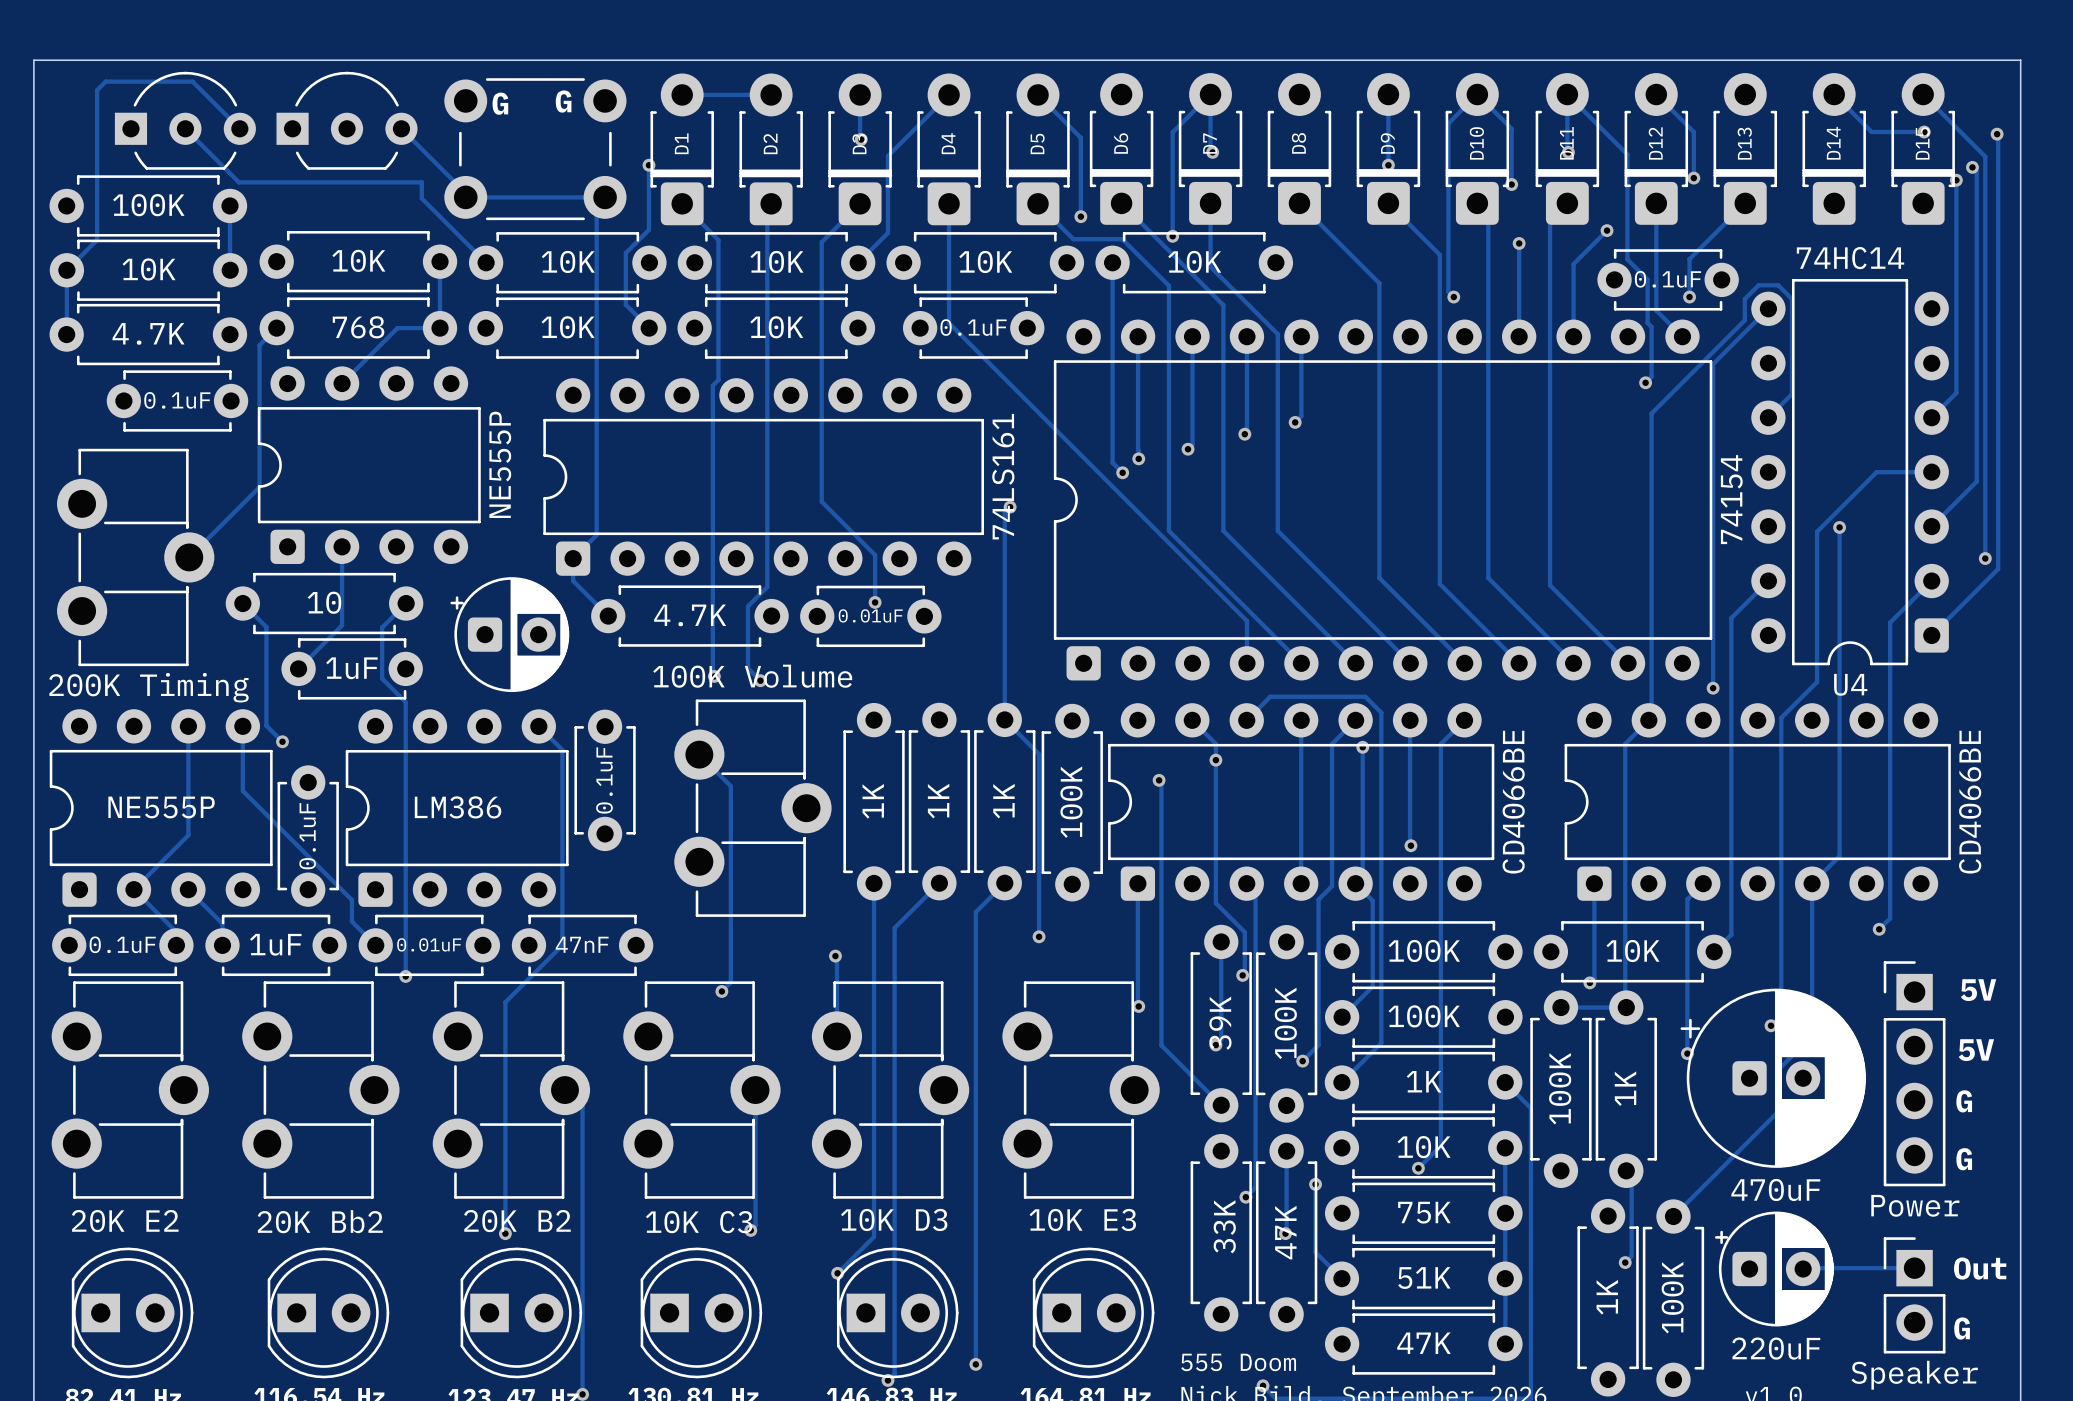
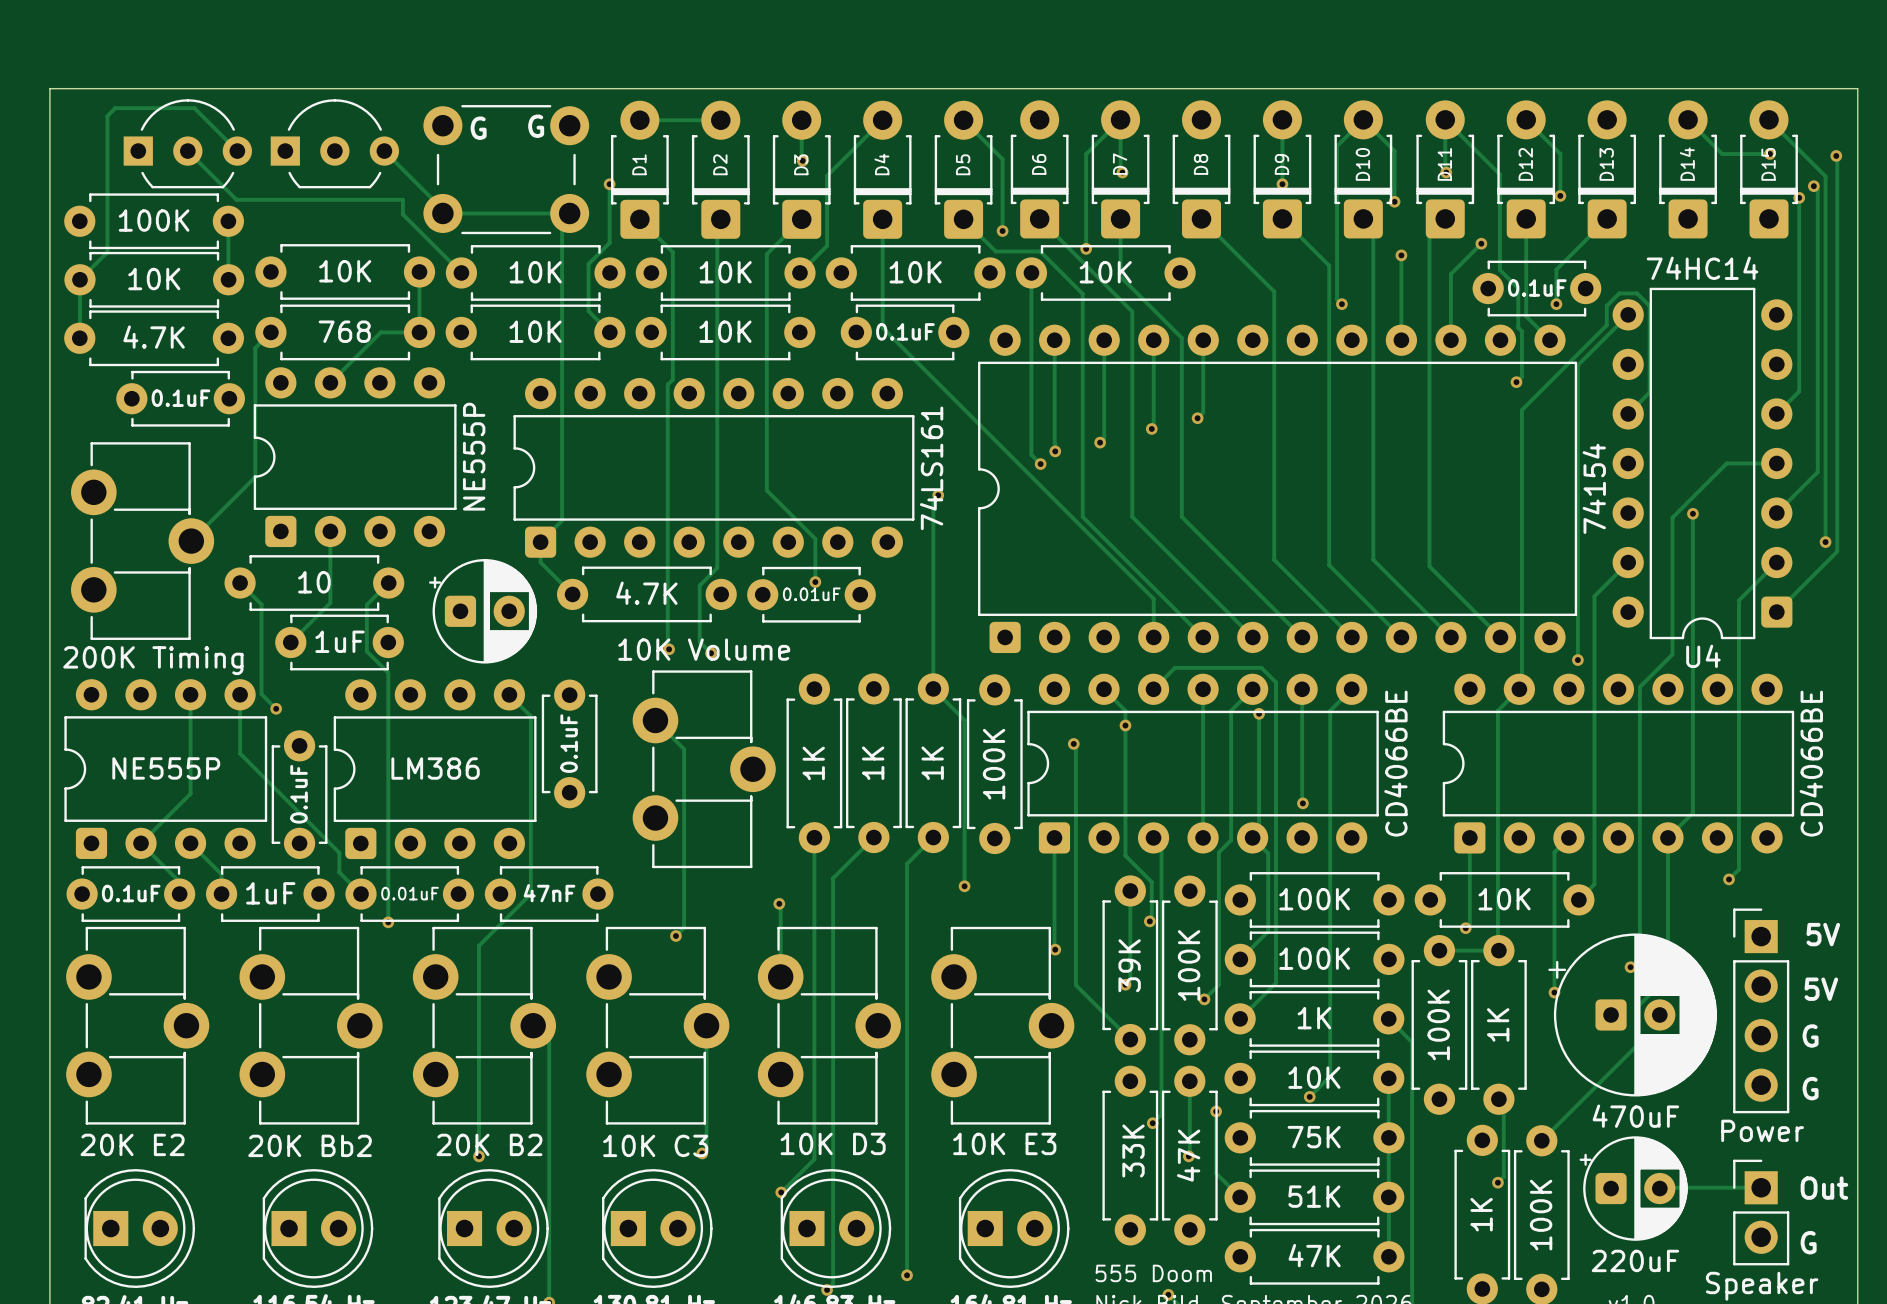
part value: 100K Volume (752, 676) -> 10K Volume (704, 649)

